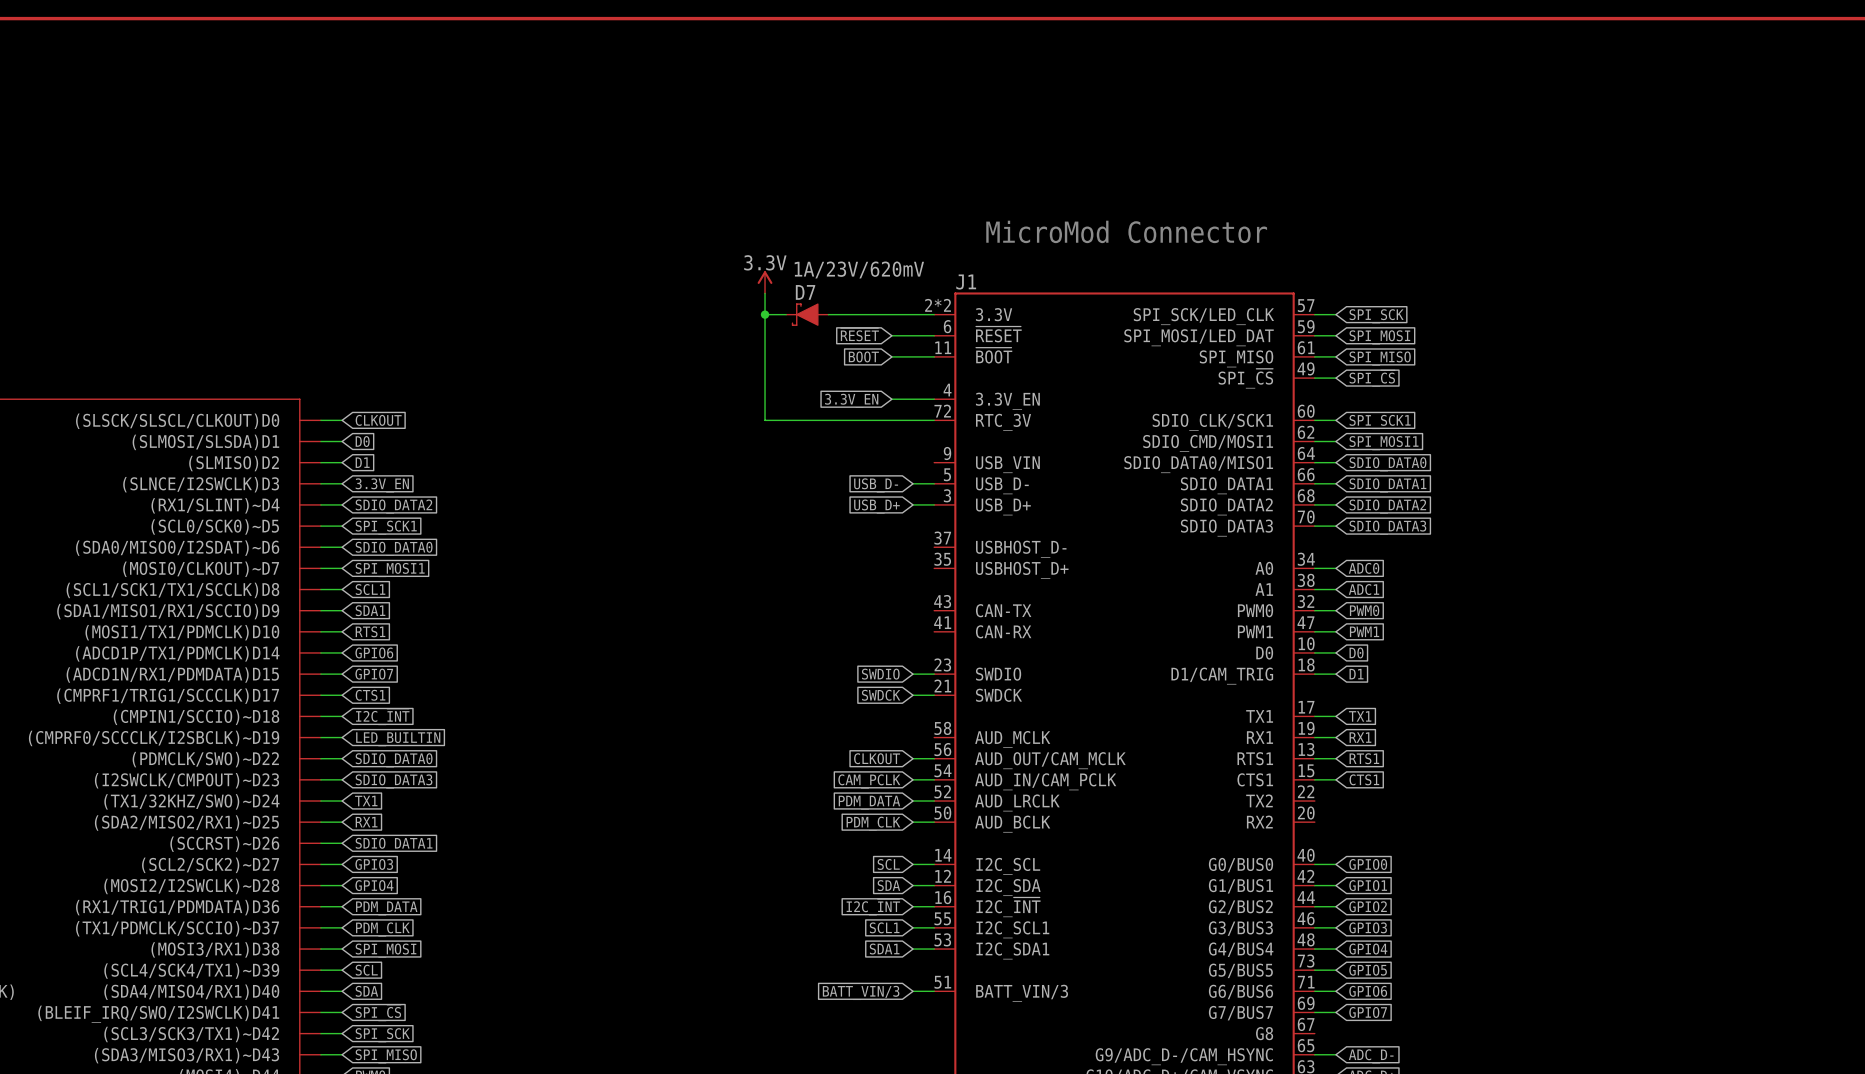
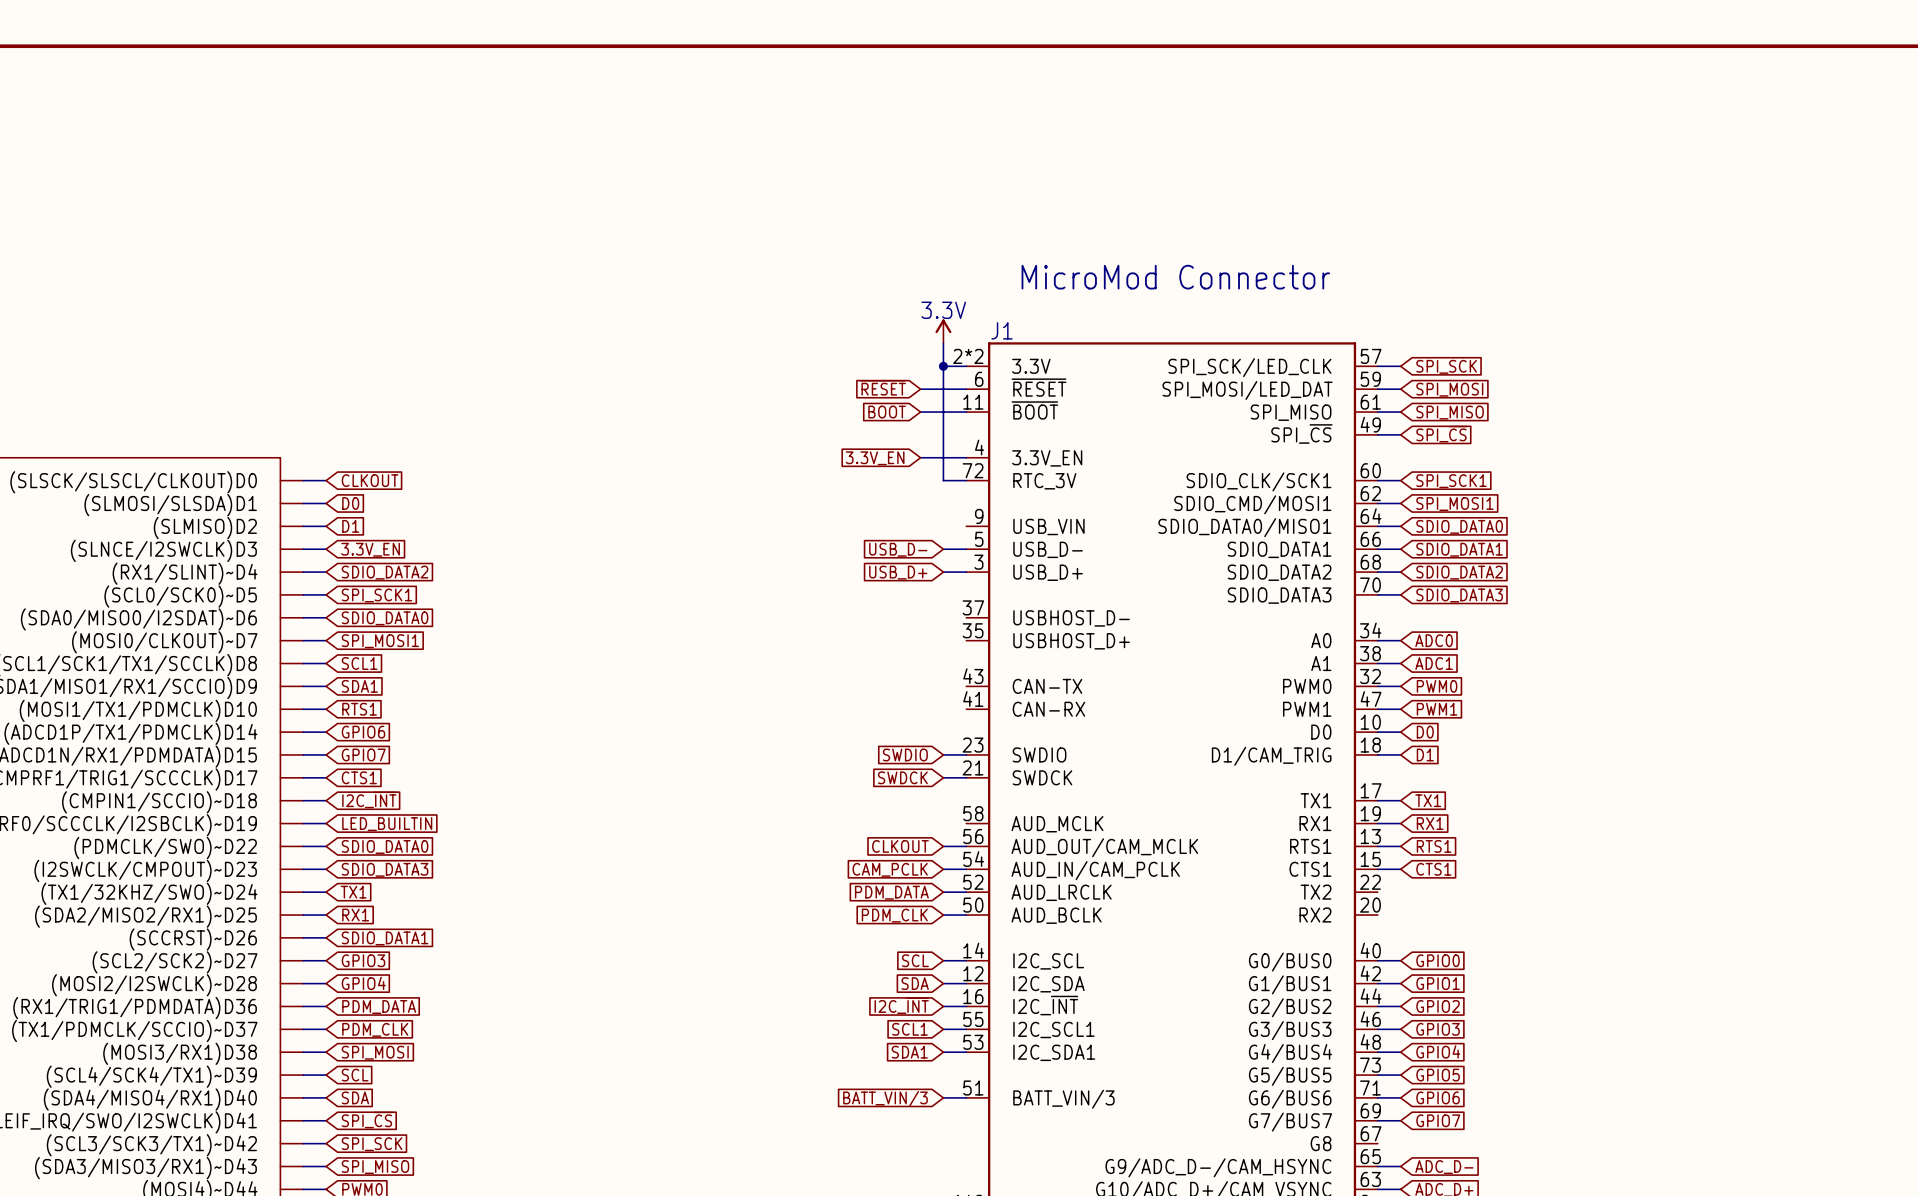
power symbol position: 3.3V (765, 282) -> 3.3V (943, 331)
wire: (765, 293) (765, 420) (913, 420) -> (943, 343) (943, 480)
wire: (765, 314) (786, 314) -> none
junction: (765, 314) -> none
D7: 1A/23V/620mV (807, 314) -> none
wire: (828, 314) (913, 314) -> none
junction: none -> (943, 366)

